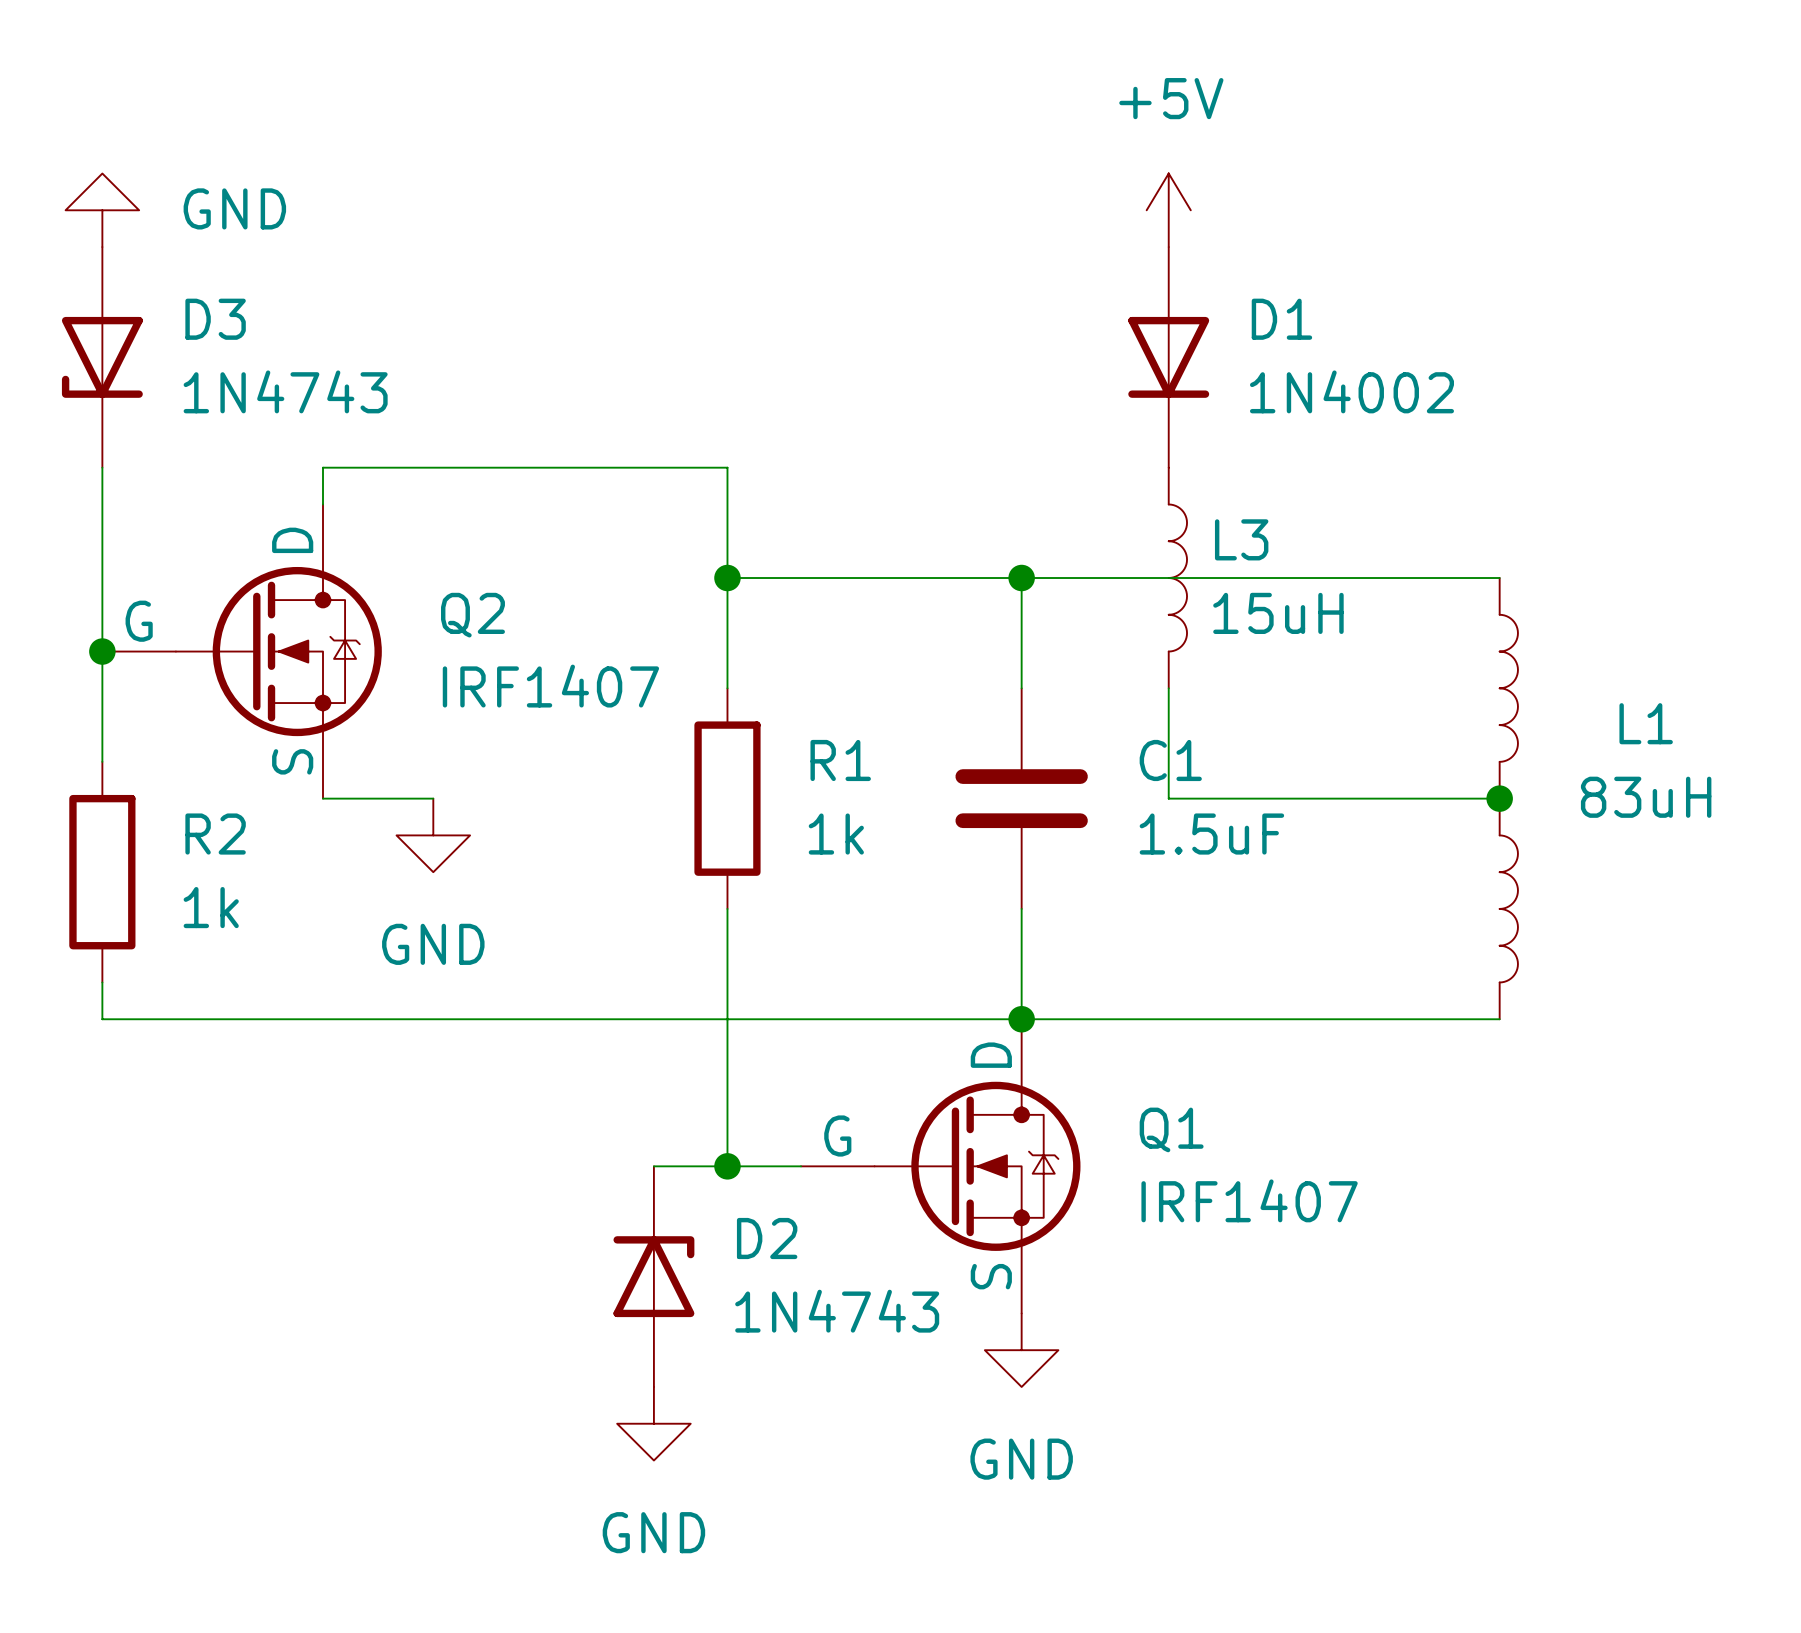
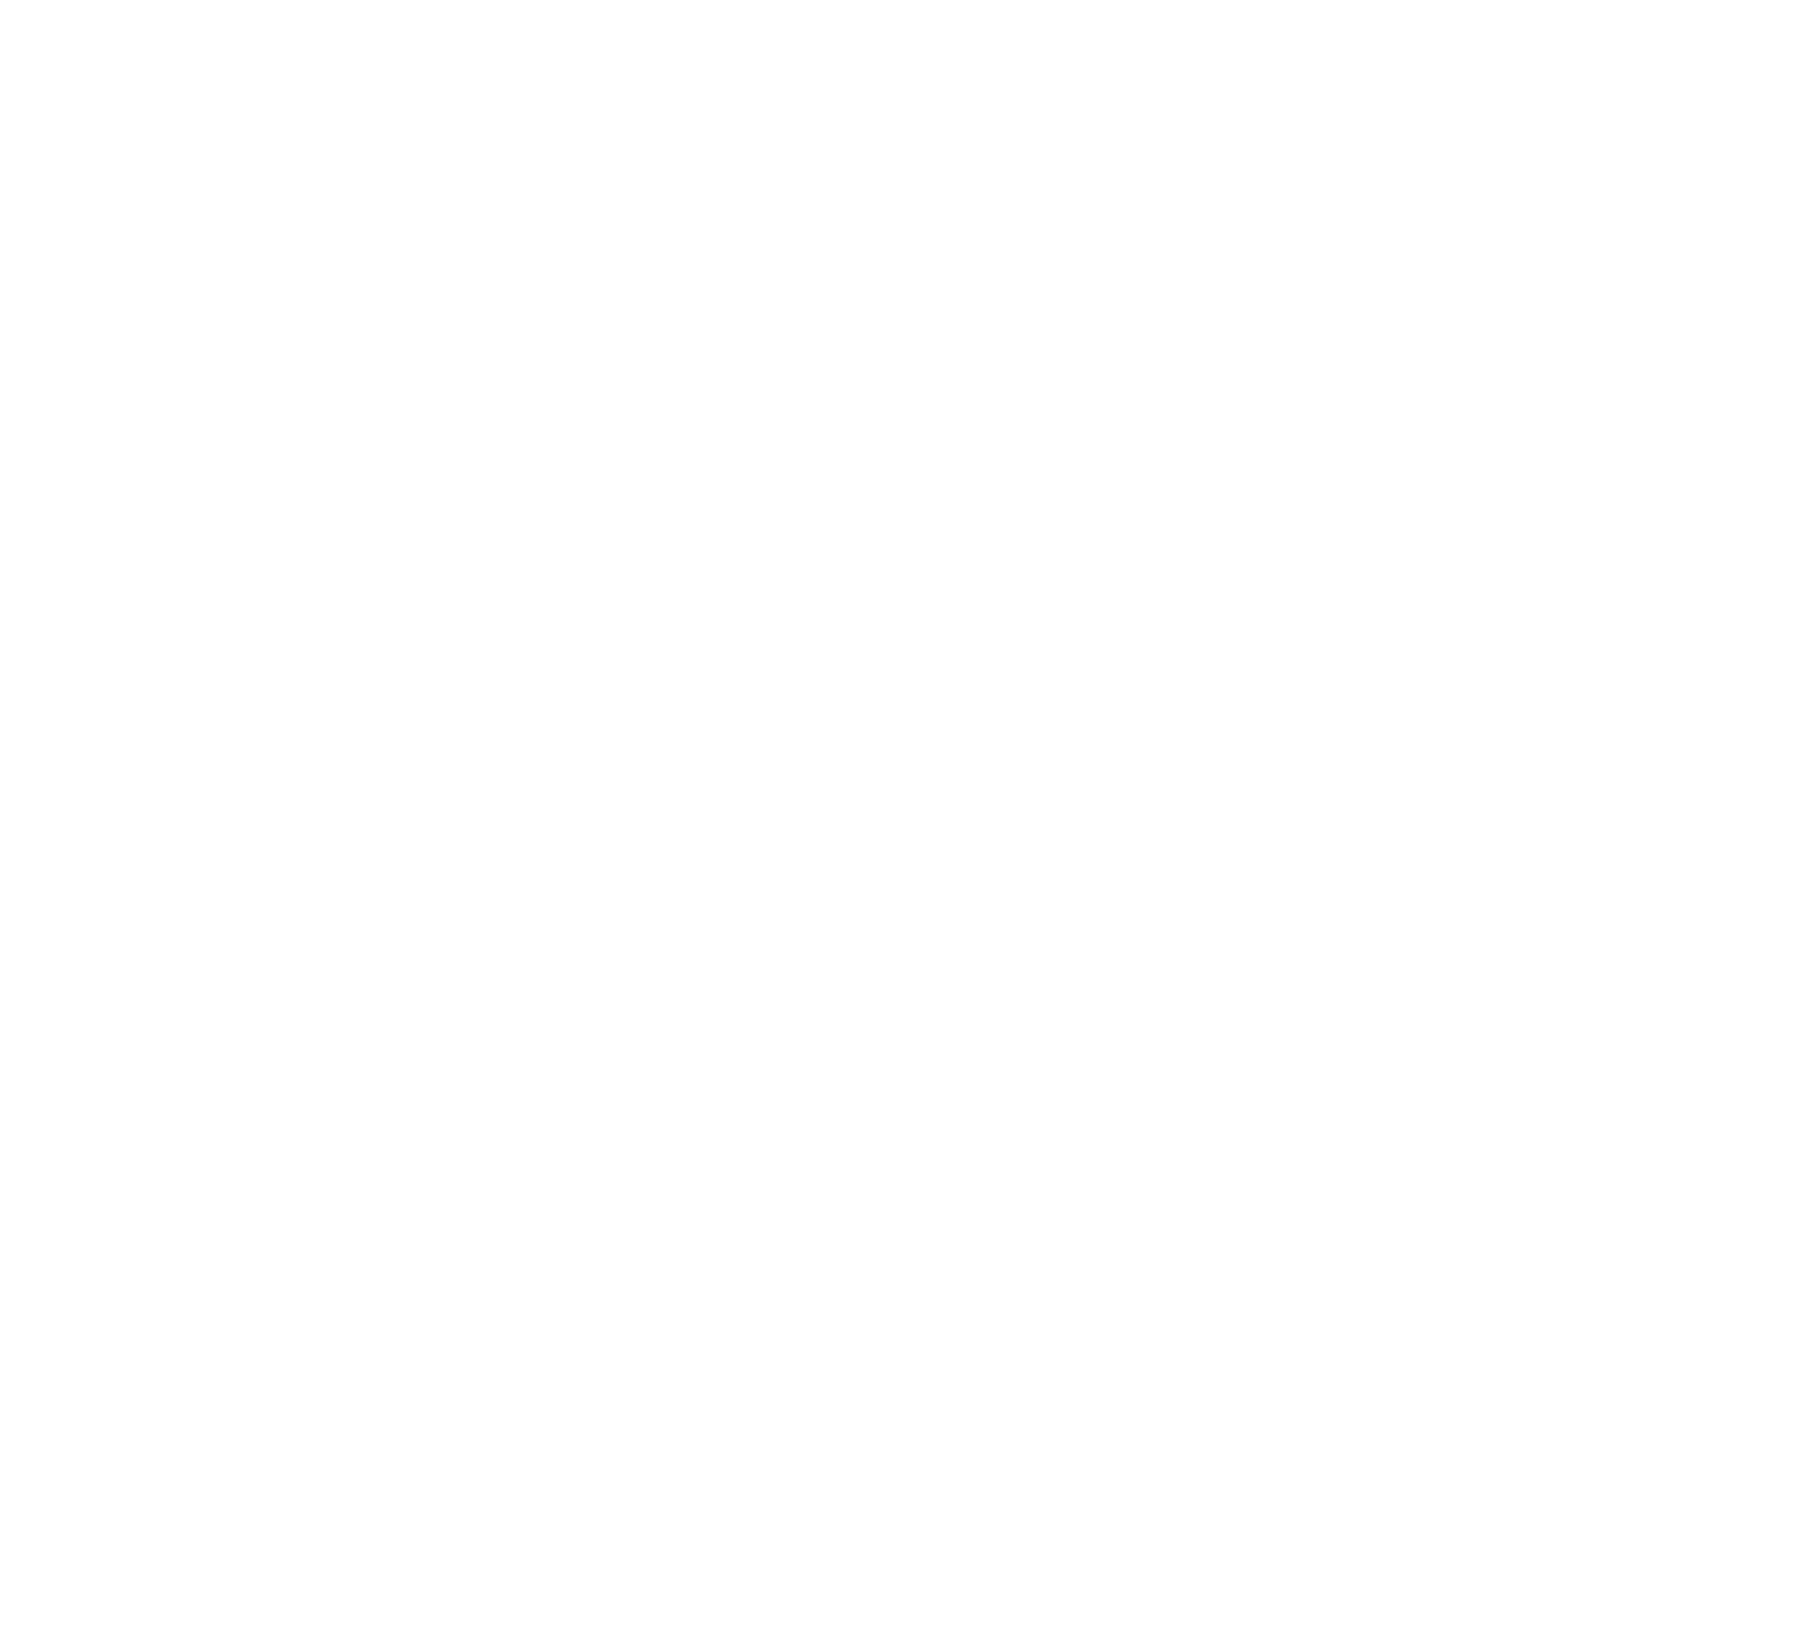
power symbol: GND (102, 210) -> none
power symbol: +5V (1168, 210) -> none
D3: 1N4743 (102, 357) -> none
D1: 1N4002 (1168, 357) -> none
wire: (102, 467) (102, 761) -> none
wire: (323, 504) (323, 467) (727, 467) (727, 688) -> none
wire: (727, 578) (1499, 578) -> none
junction: (727, 578) -> none
wire: (1021, 578) (1021, 688) -> none
junction: (1021, 578) -> none
L3: 15uH (1177, 578) -> none
junction: (102, 651) -> none
Q2: IRF1407 (242, 651) -> none
wire: (1168, 688) (1168, 798) (1499, 798) -> none
L1: 83uH (1508, 688) -> none
wire: (323, 798) (433, 798) -> none
R1: 1k (727, 798) -> none
C1: 1.5uF (1021, 798) -> none
junction: (1499, 798) -> none
power symbol: GND (433, 835) -> none
R2: 1k (102, 872) -> none
wire: (727, 908) (727, 1166) -> none
wire: (1021, 908) (1021, 1019) -> none
part: (1508, 908) -> none
wire: (102, 982) (102, 1019) (1499, 1019) -> none
junction: (1021, 1019) -> none
wire: (653, 1166) (801, 1166) -> none
junction: (727, 1166) -> none
Q1: IRF1407 (940, 1166) -> none
D2: 1N4743 (653, 1276) -> none
power symbol: GND (1021, 1350) -> none
power symbol: GND (653, 1423) -> none

